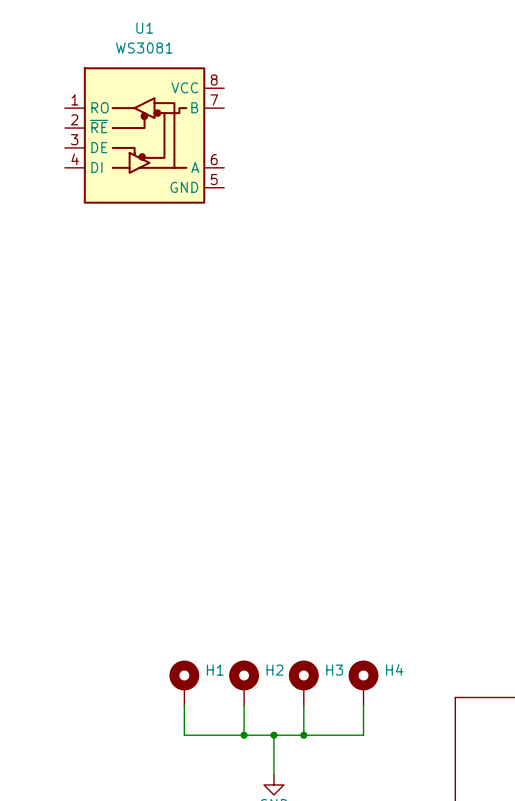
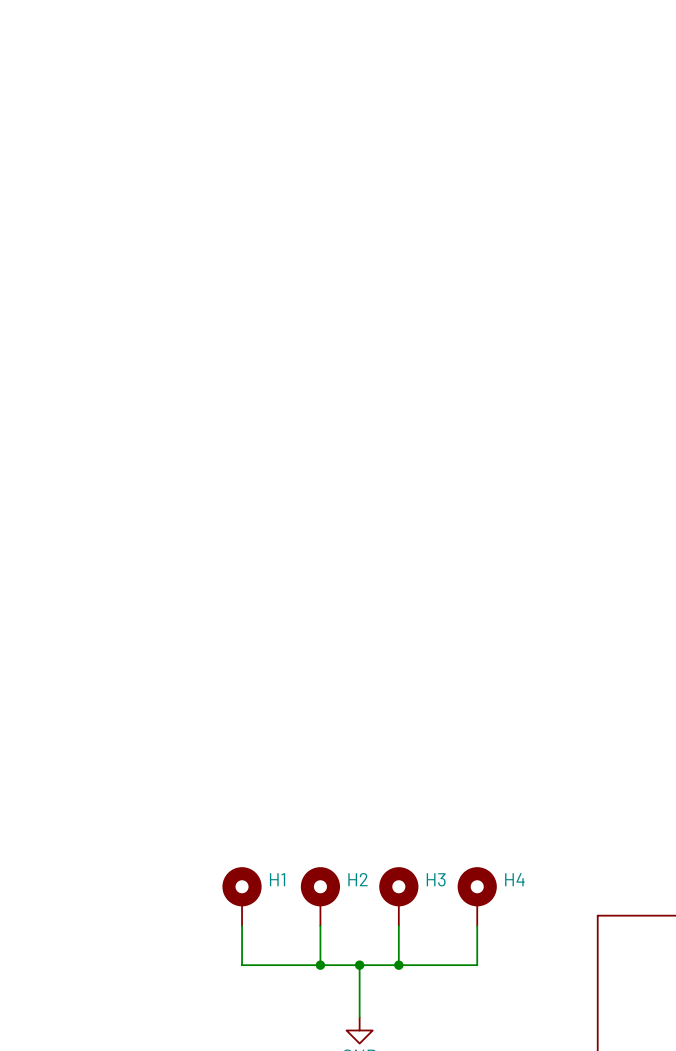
U1: WS3081 (144, 135) -> none

